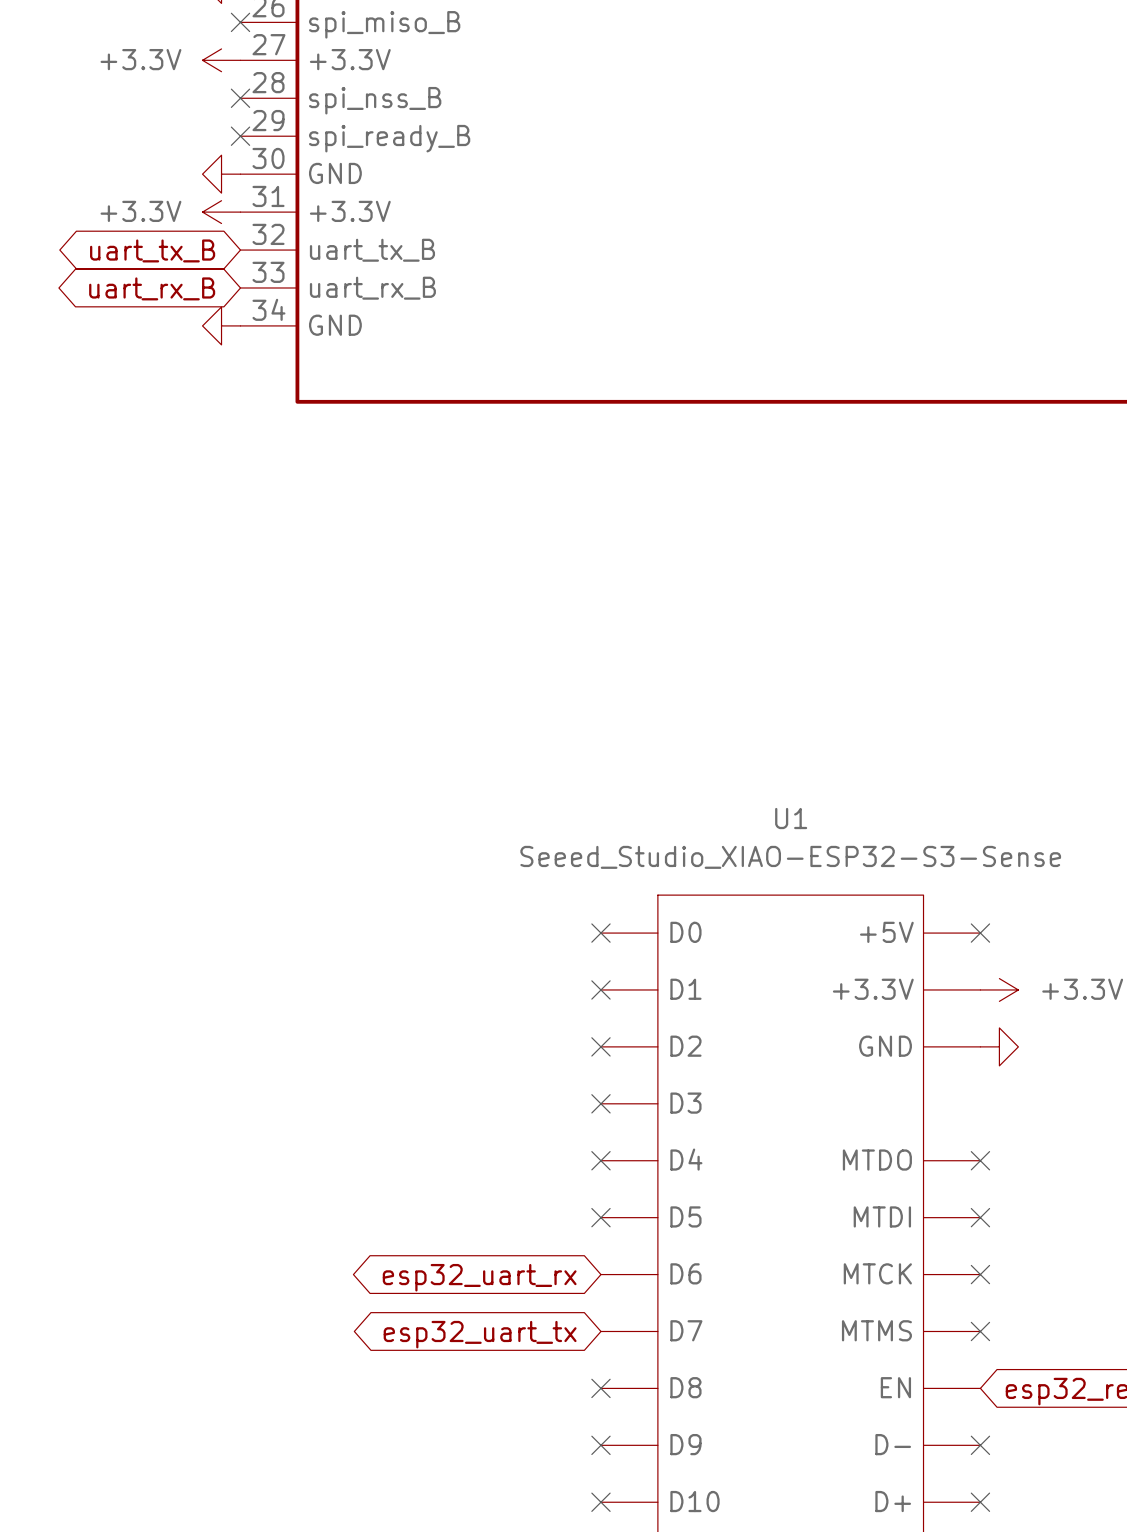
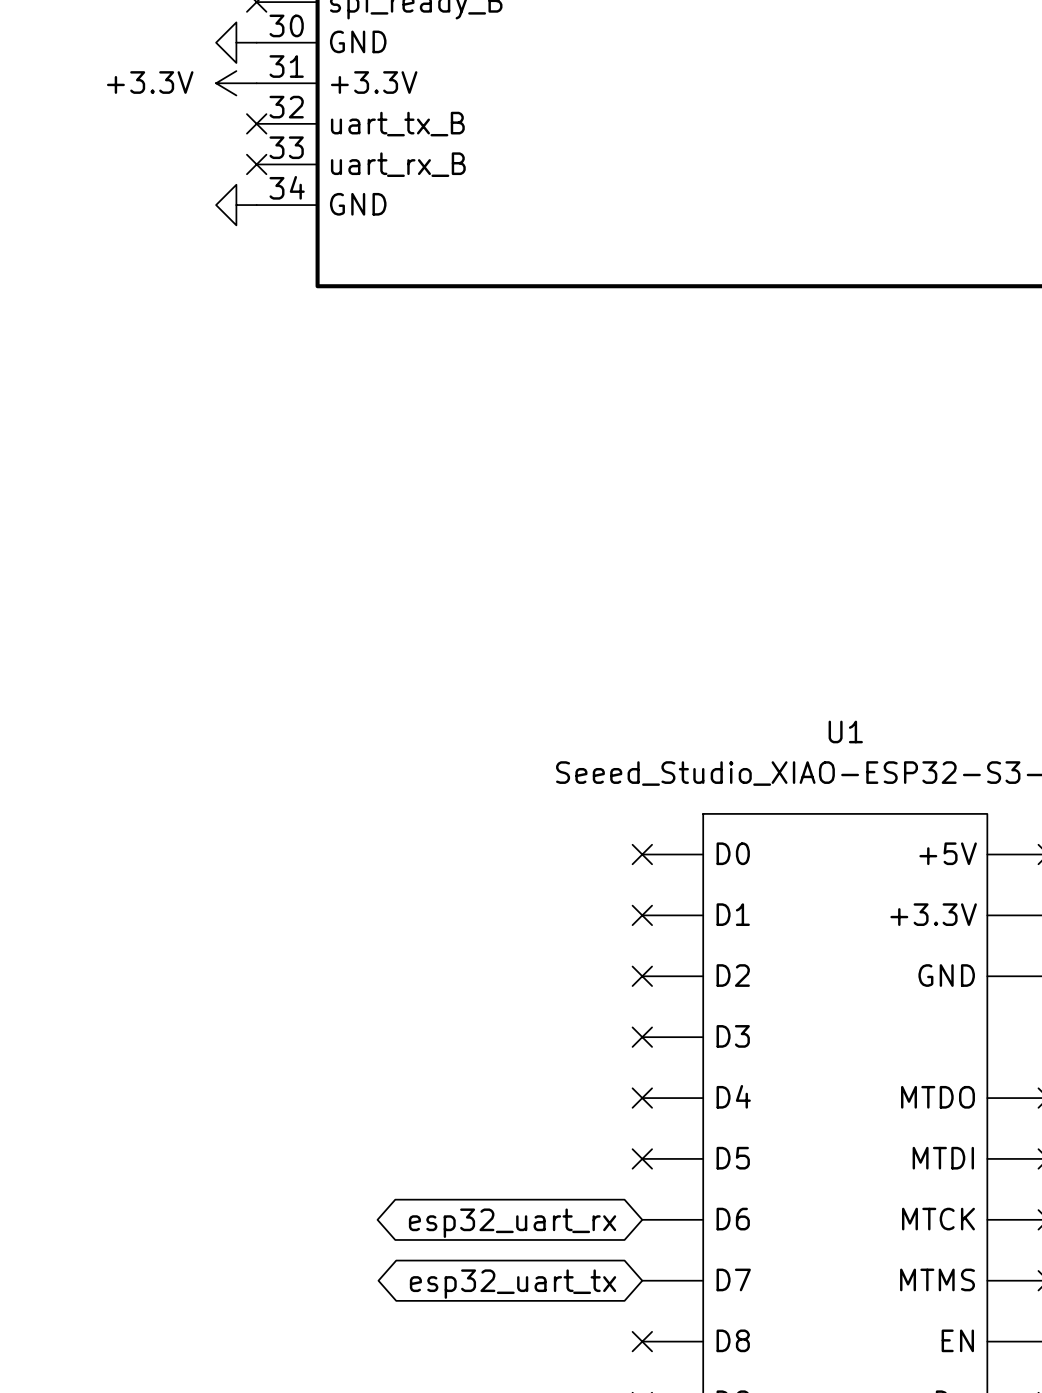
global label: uart_tx_B (152, 250) -> none
no-connect mark: none -> (256, 123)
no-connect mark: none -> (256, 164)
global label: uart_rx_B (152, 288) -> none

